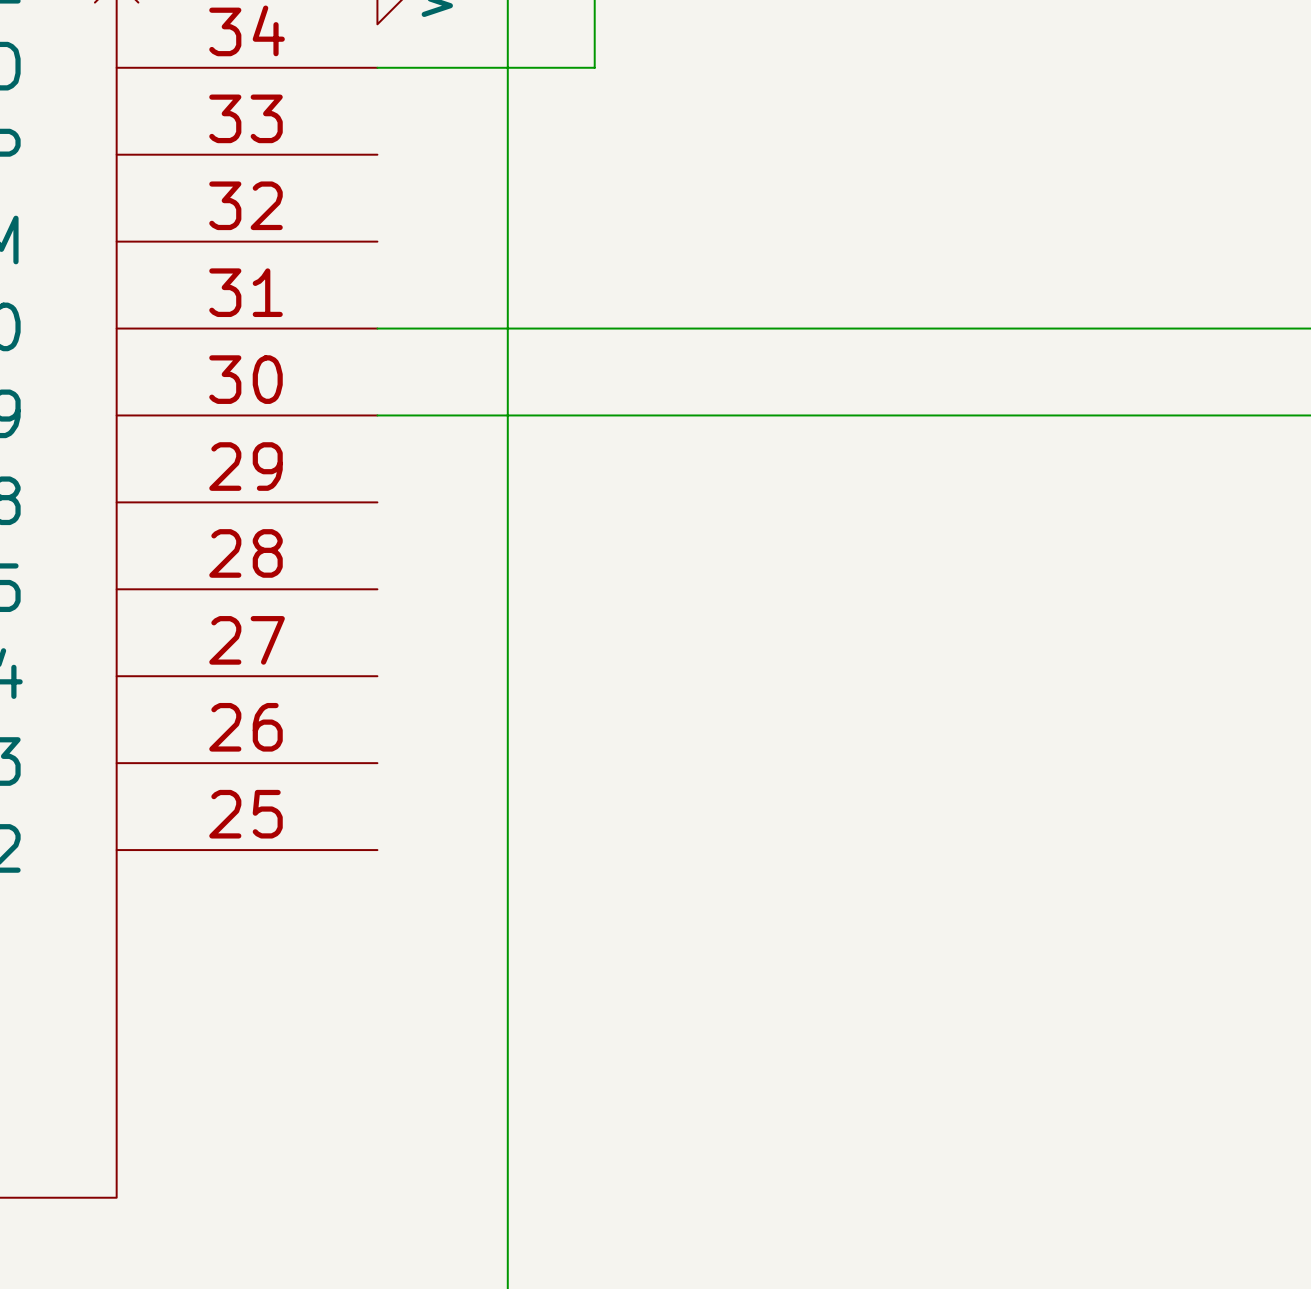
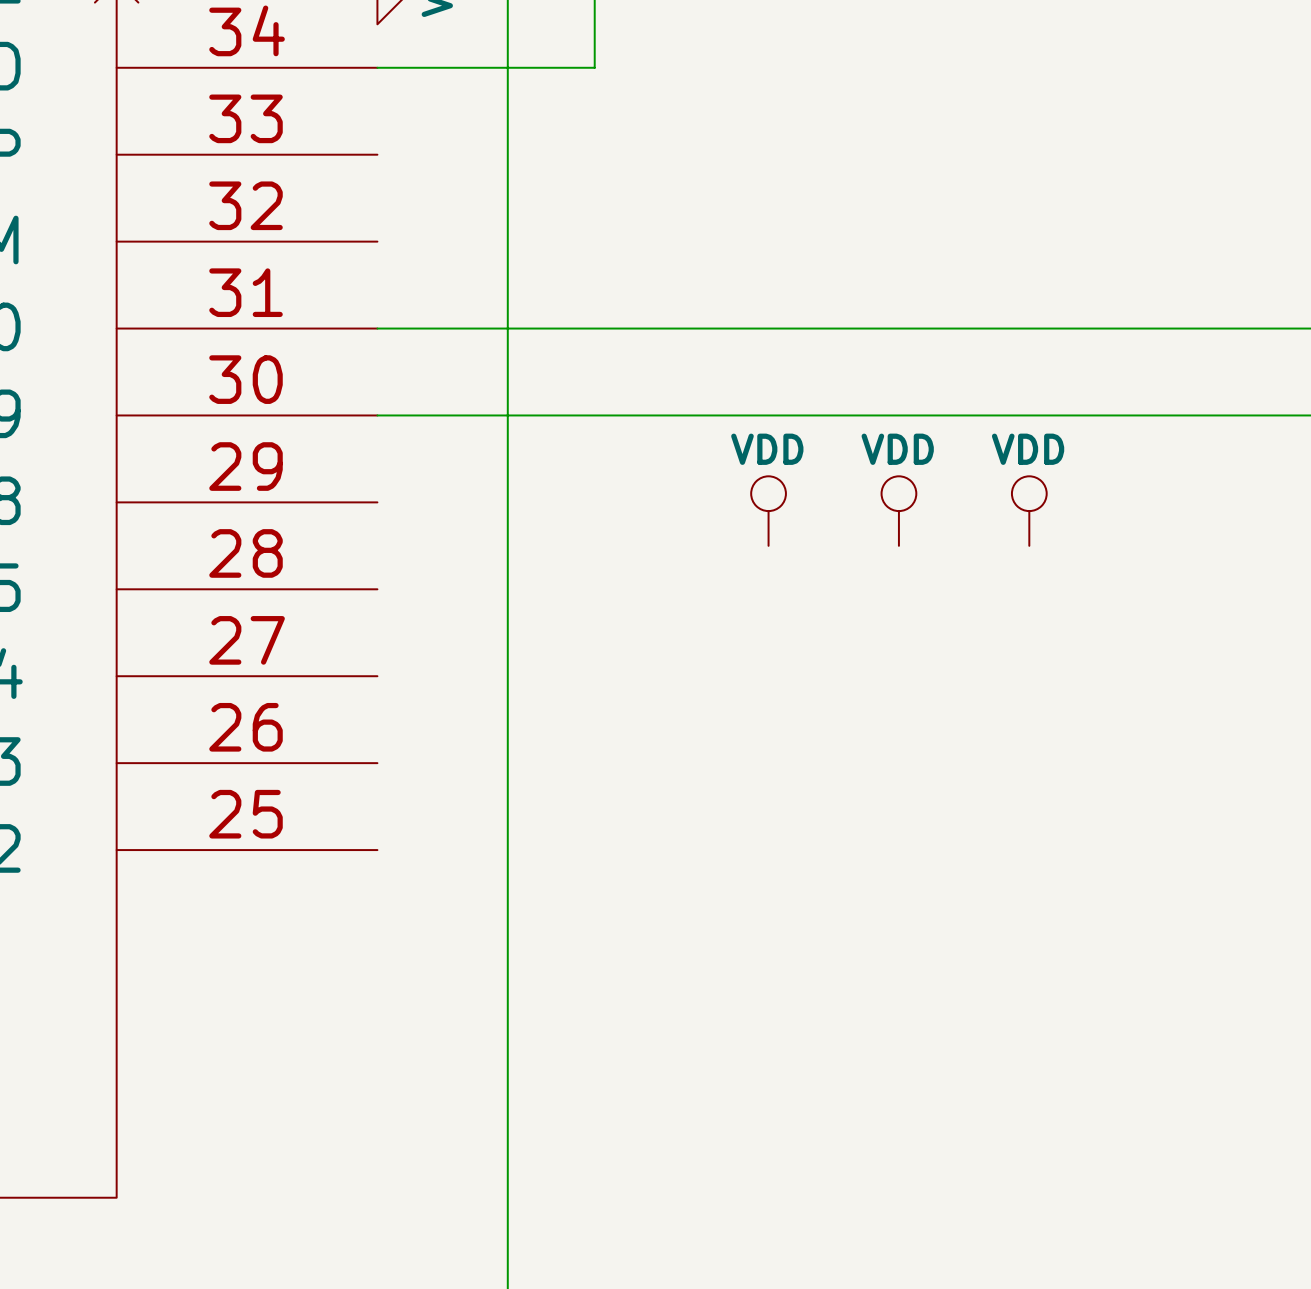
power symbol: none -> VDD (768, 511)
power symbol: none -> VDD (898, 511)
power symbol: none -> VDD (1029, 511)

